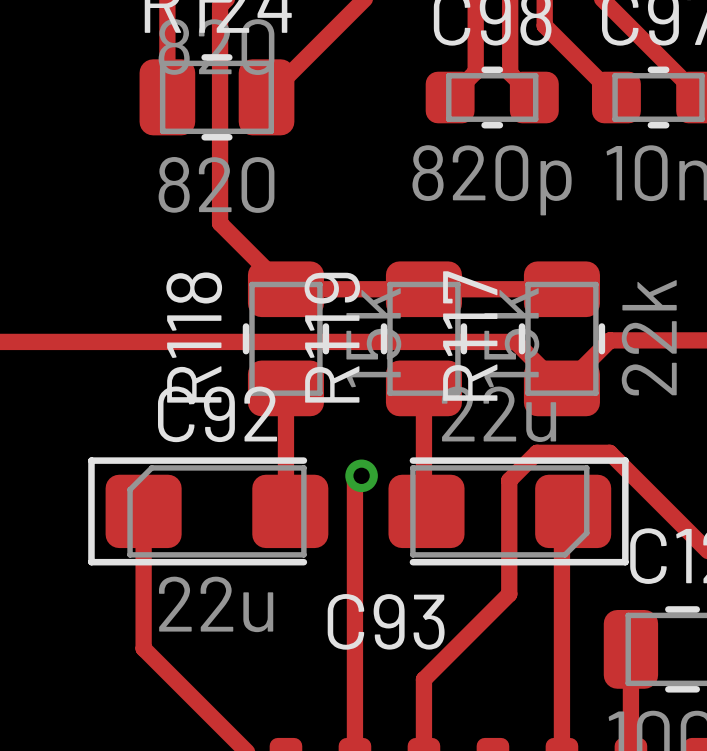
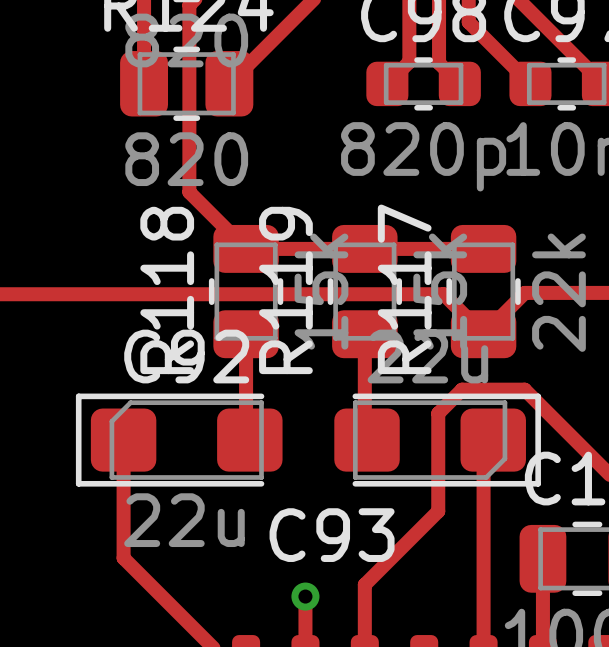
track: (361, 475) (354, 482) (354, 693) -> none
via position: (361, 475) -> (305, 596)

